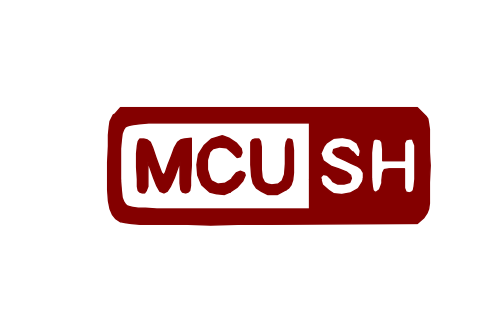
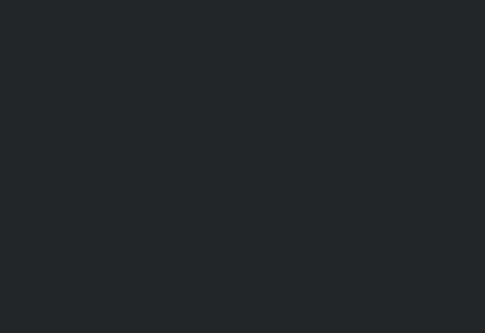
part: (268, 166) -> none

